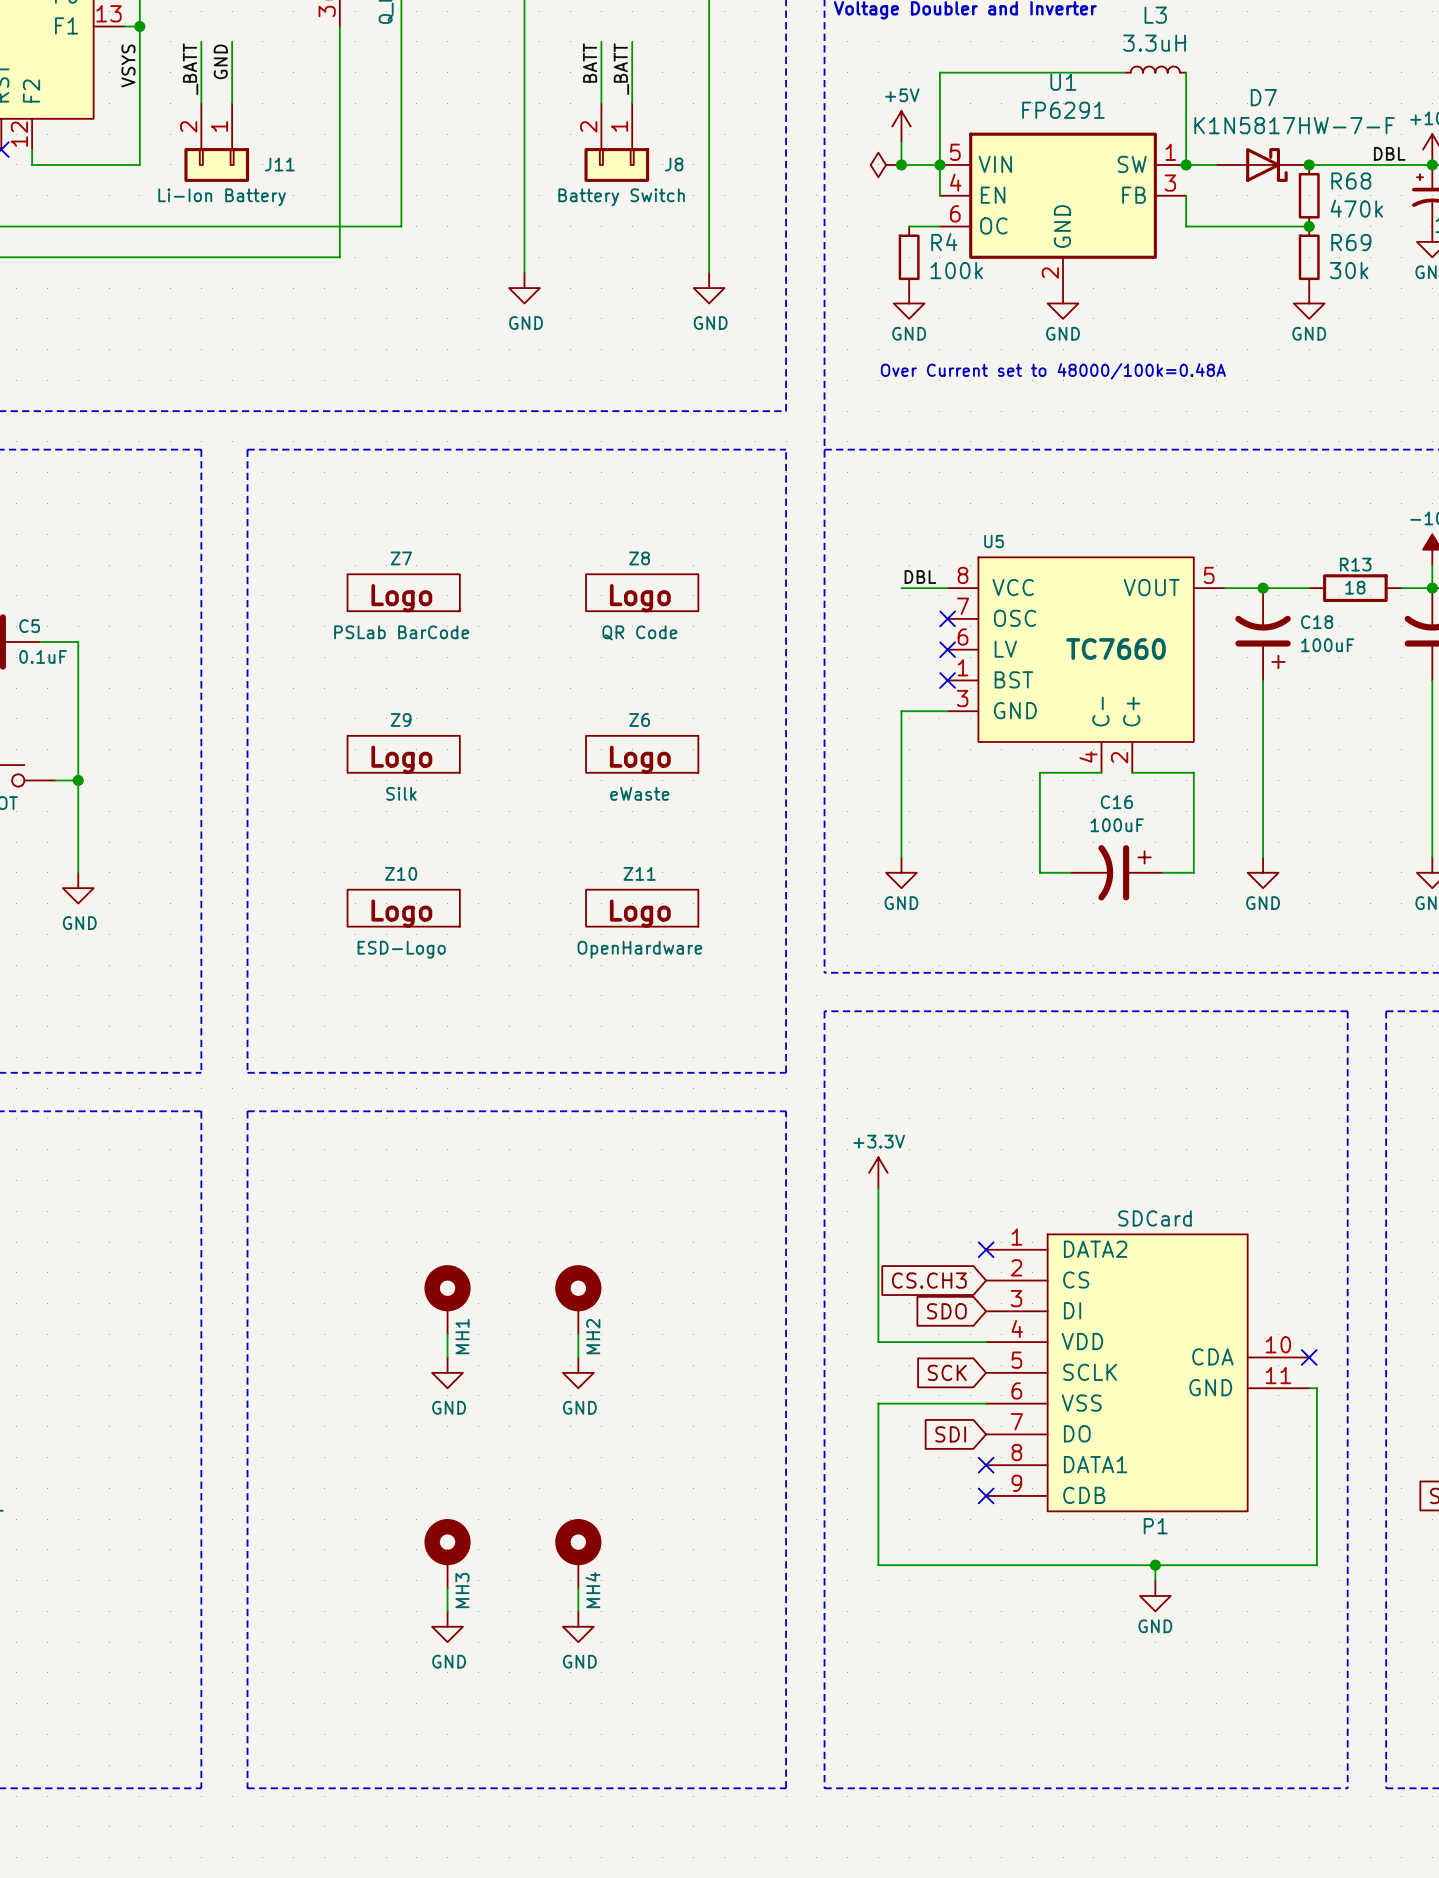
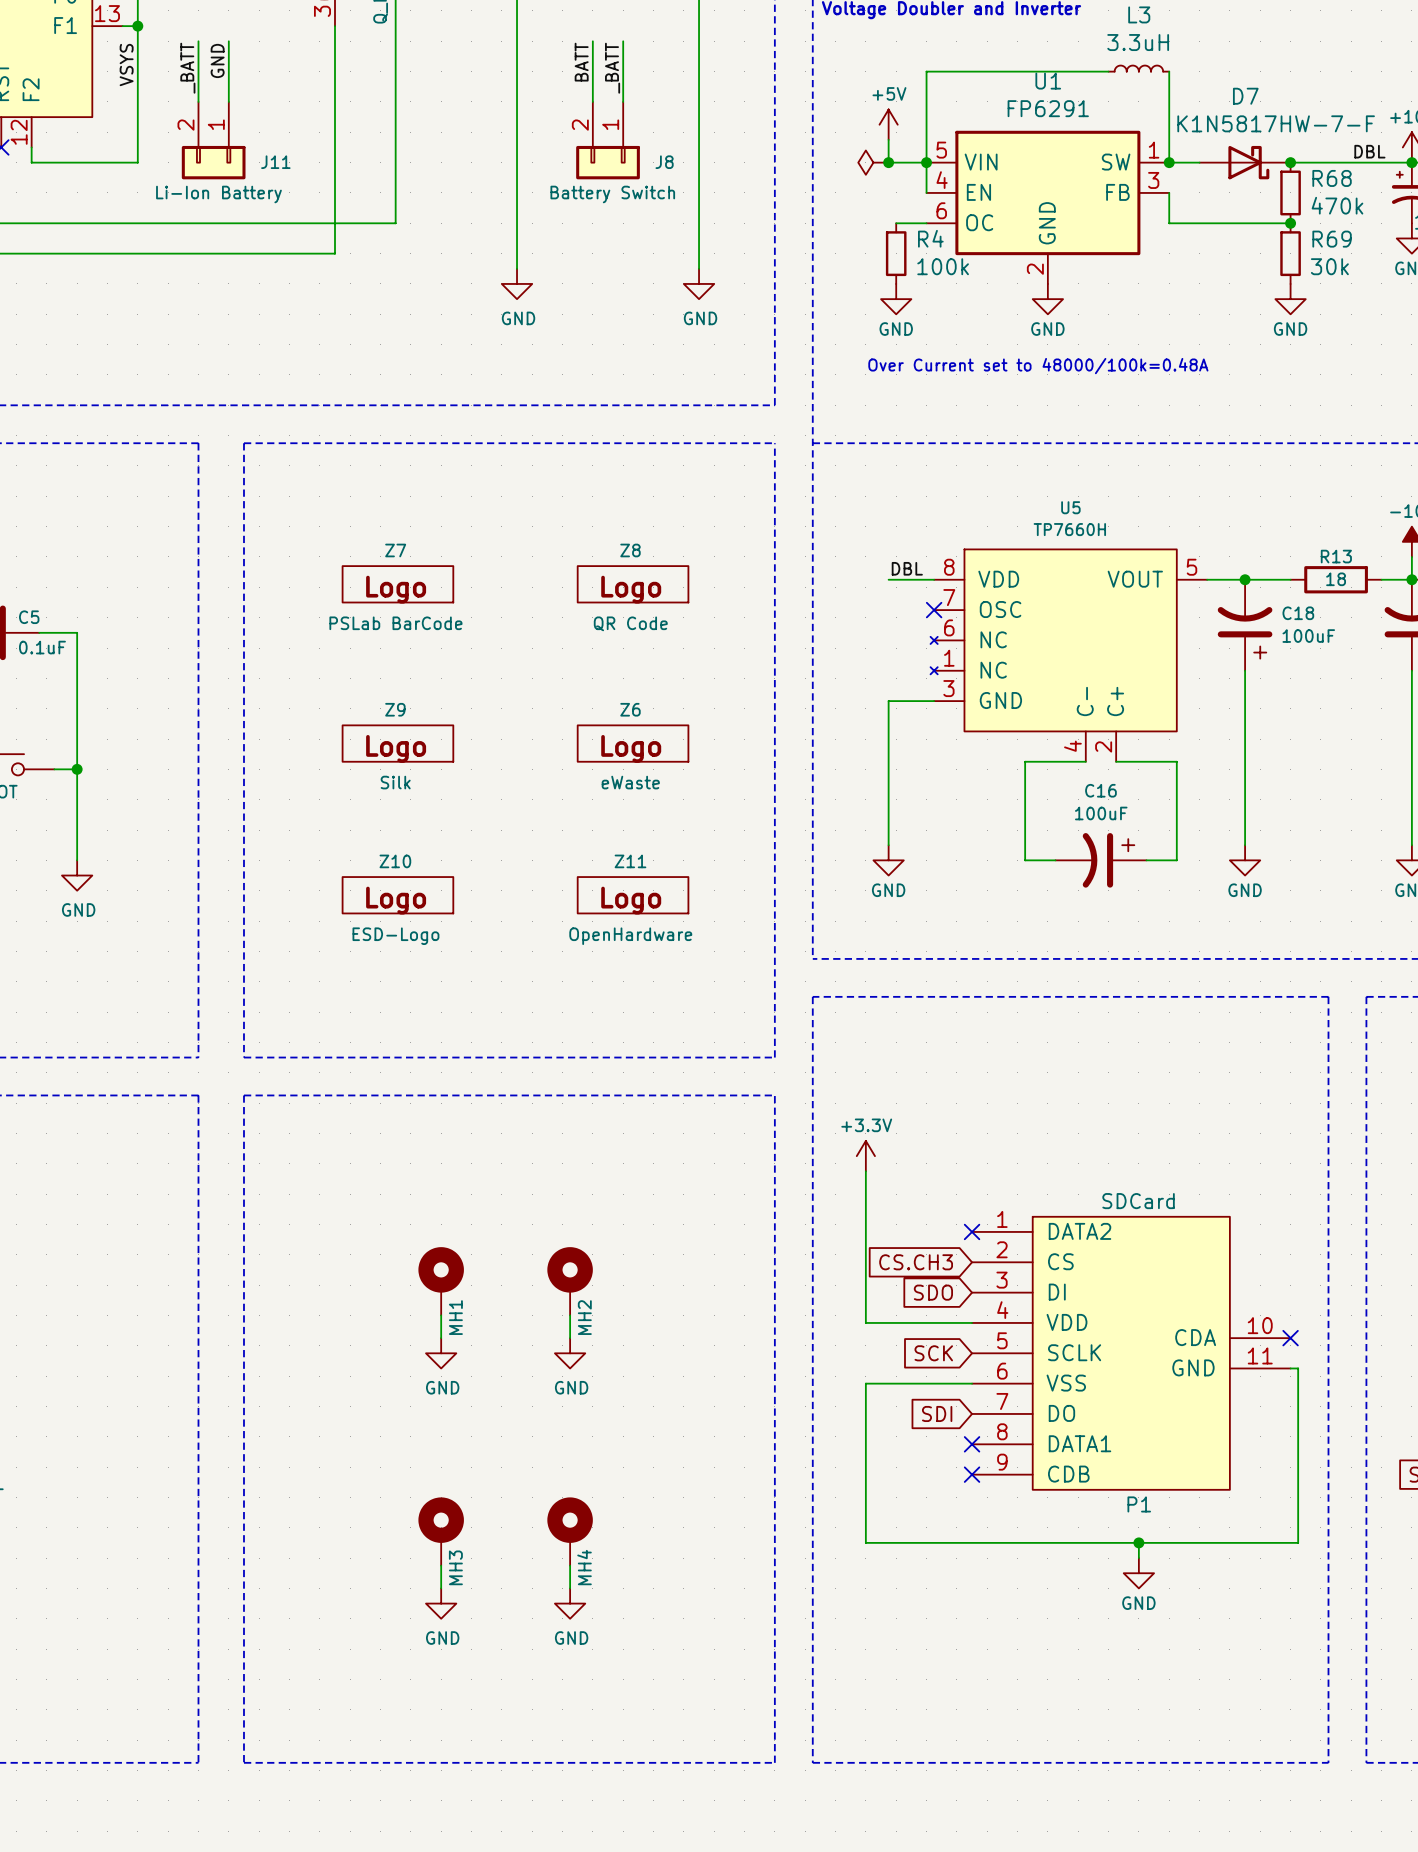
U5 name position: U5 (994, 541) -> U5 (1070, 507)
U5 symbol: [947, 557, 1225, 773] -> [930, 549, 1208, 762]
U5 value: TC7660 (1116, 648) -> TP7660H (1069, 529)
no-connect mark: (947, 649) -> none
no-connect mark: (947, 680) -> none

